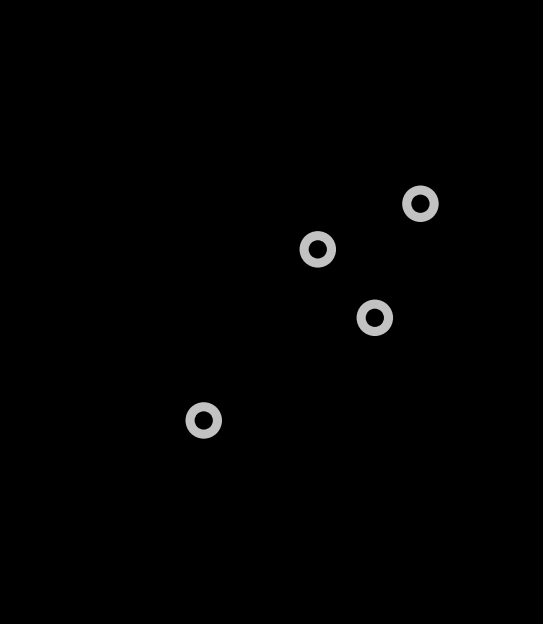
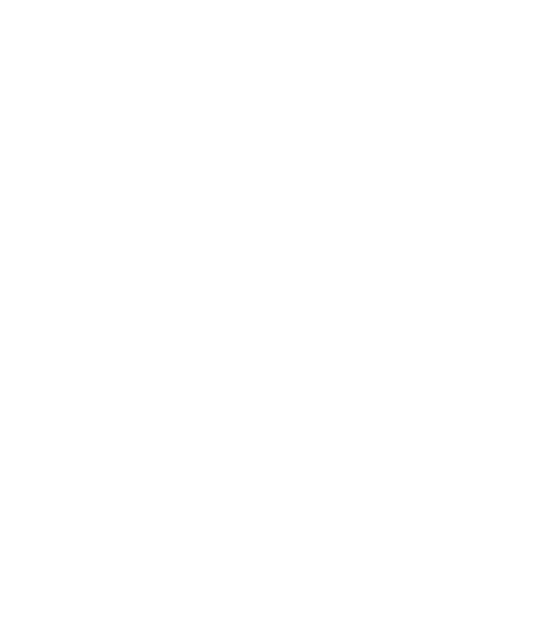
via: (420, 203) -> none
via: (317, 249) -> none
via: (374, 317) -> none
via: (203, 420) -> none

